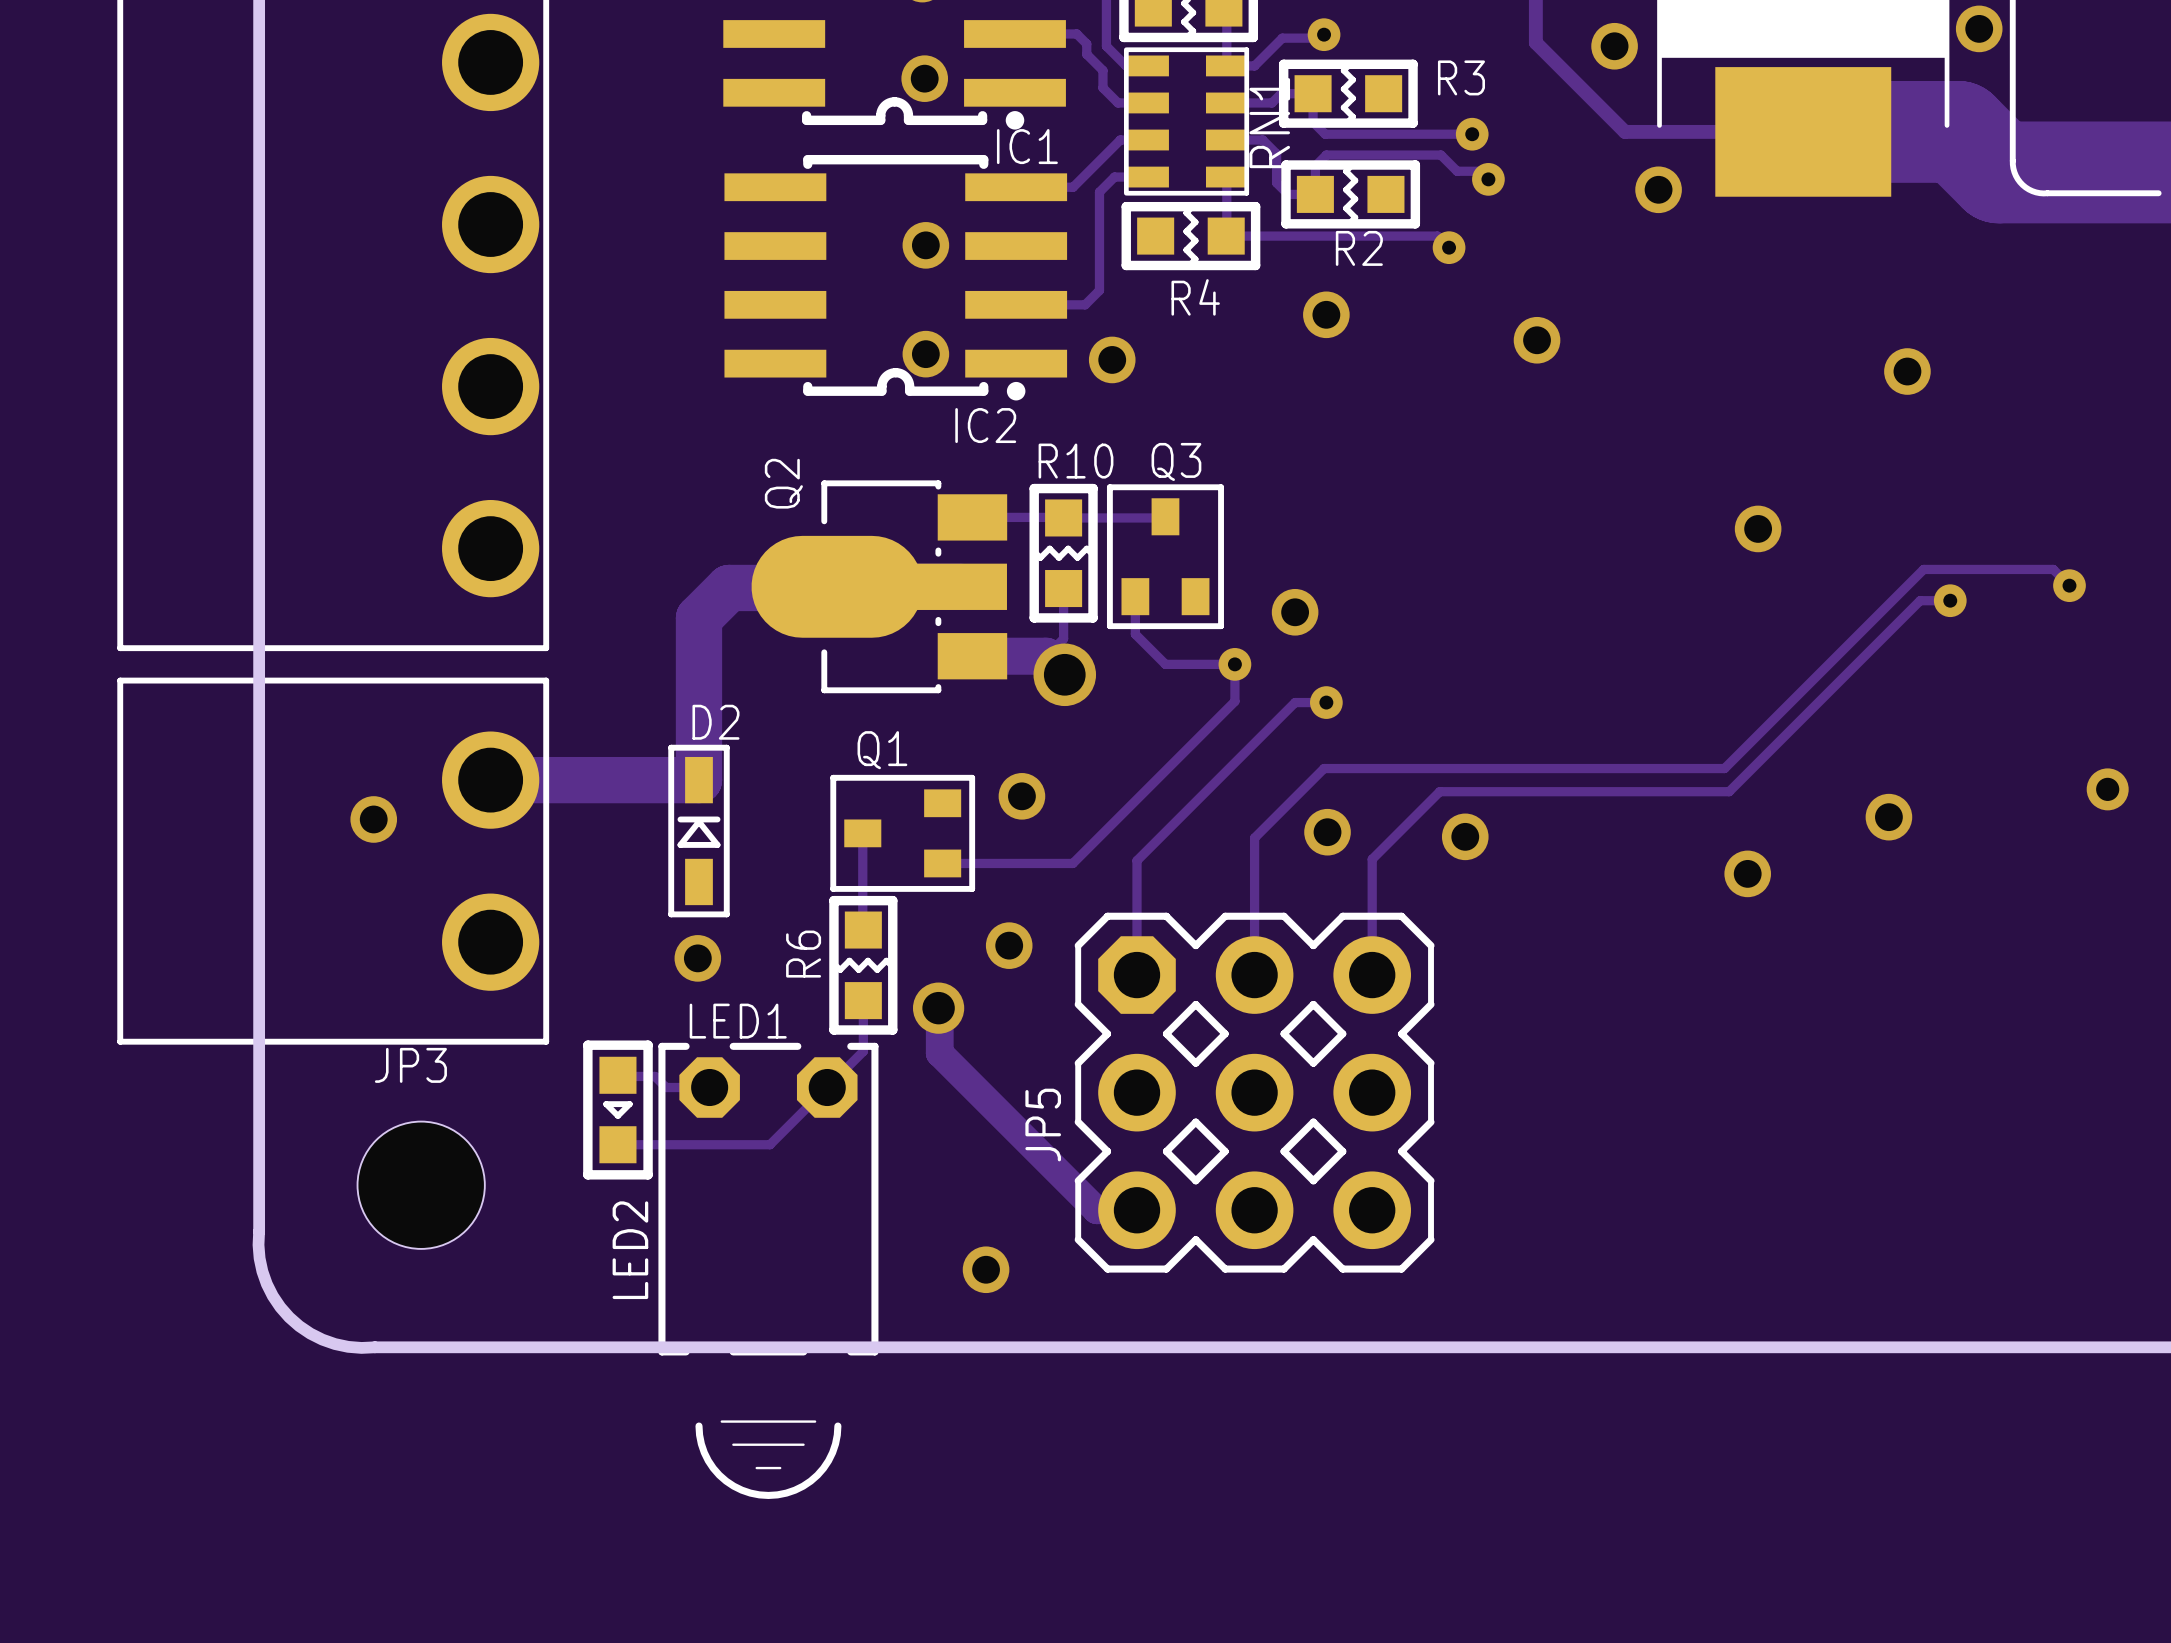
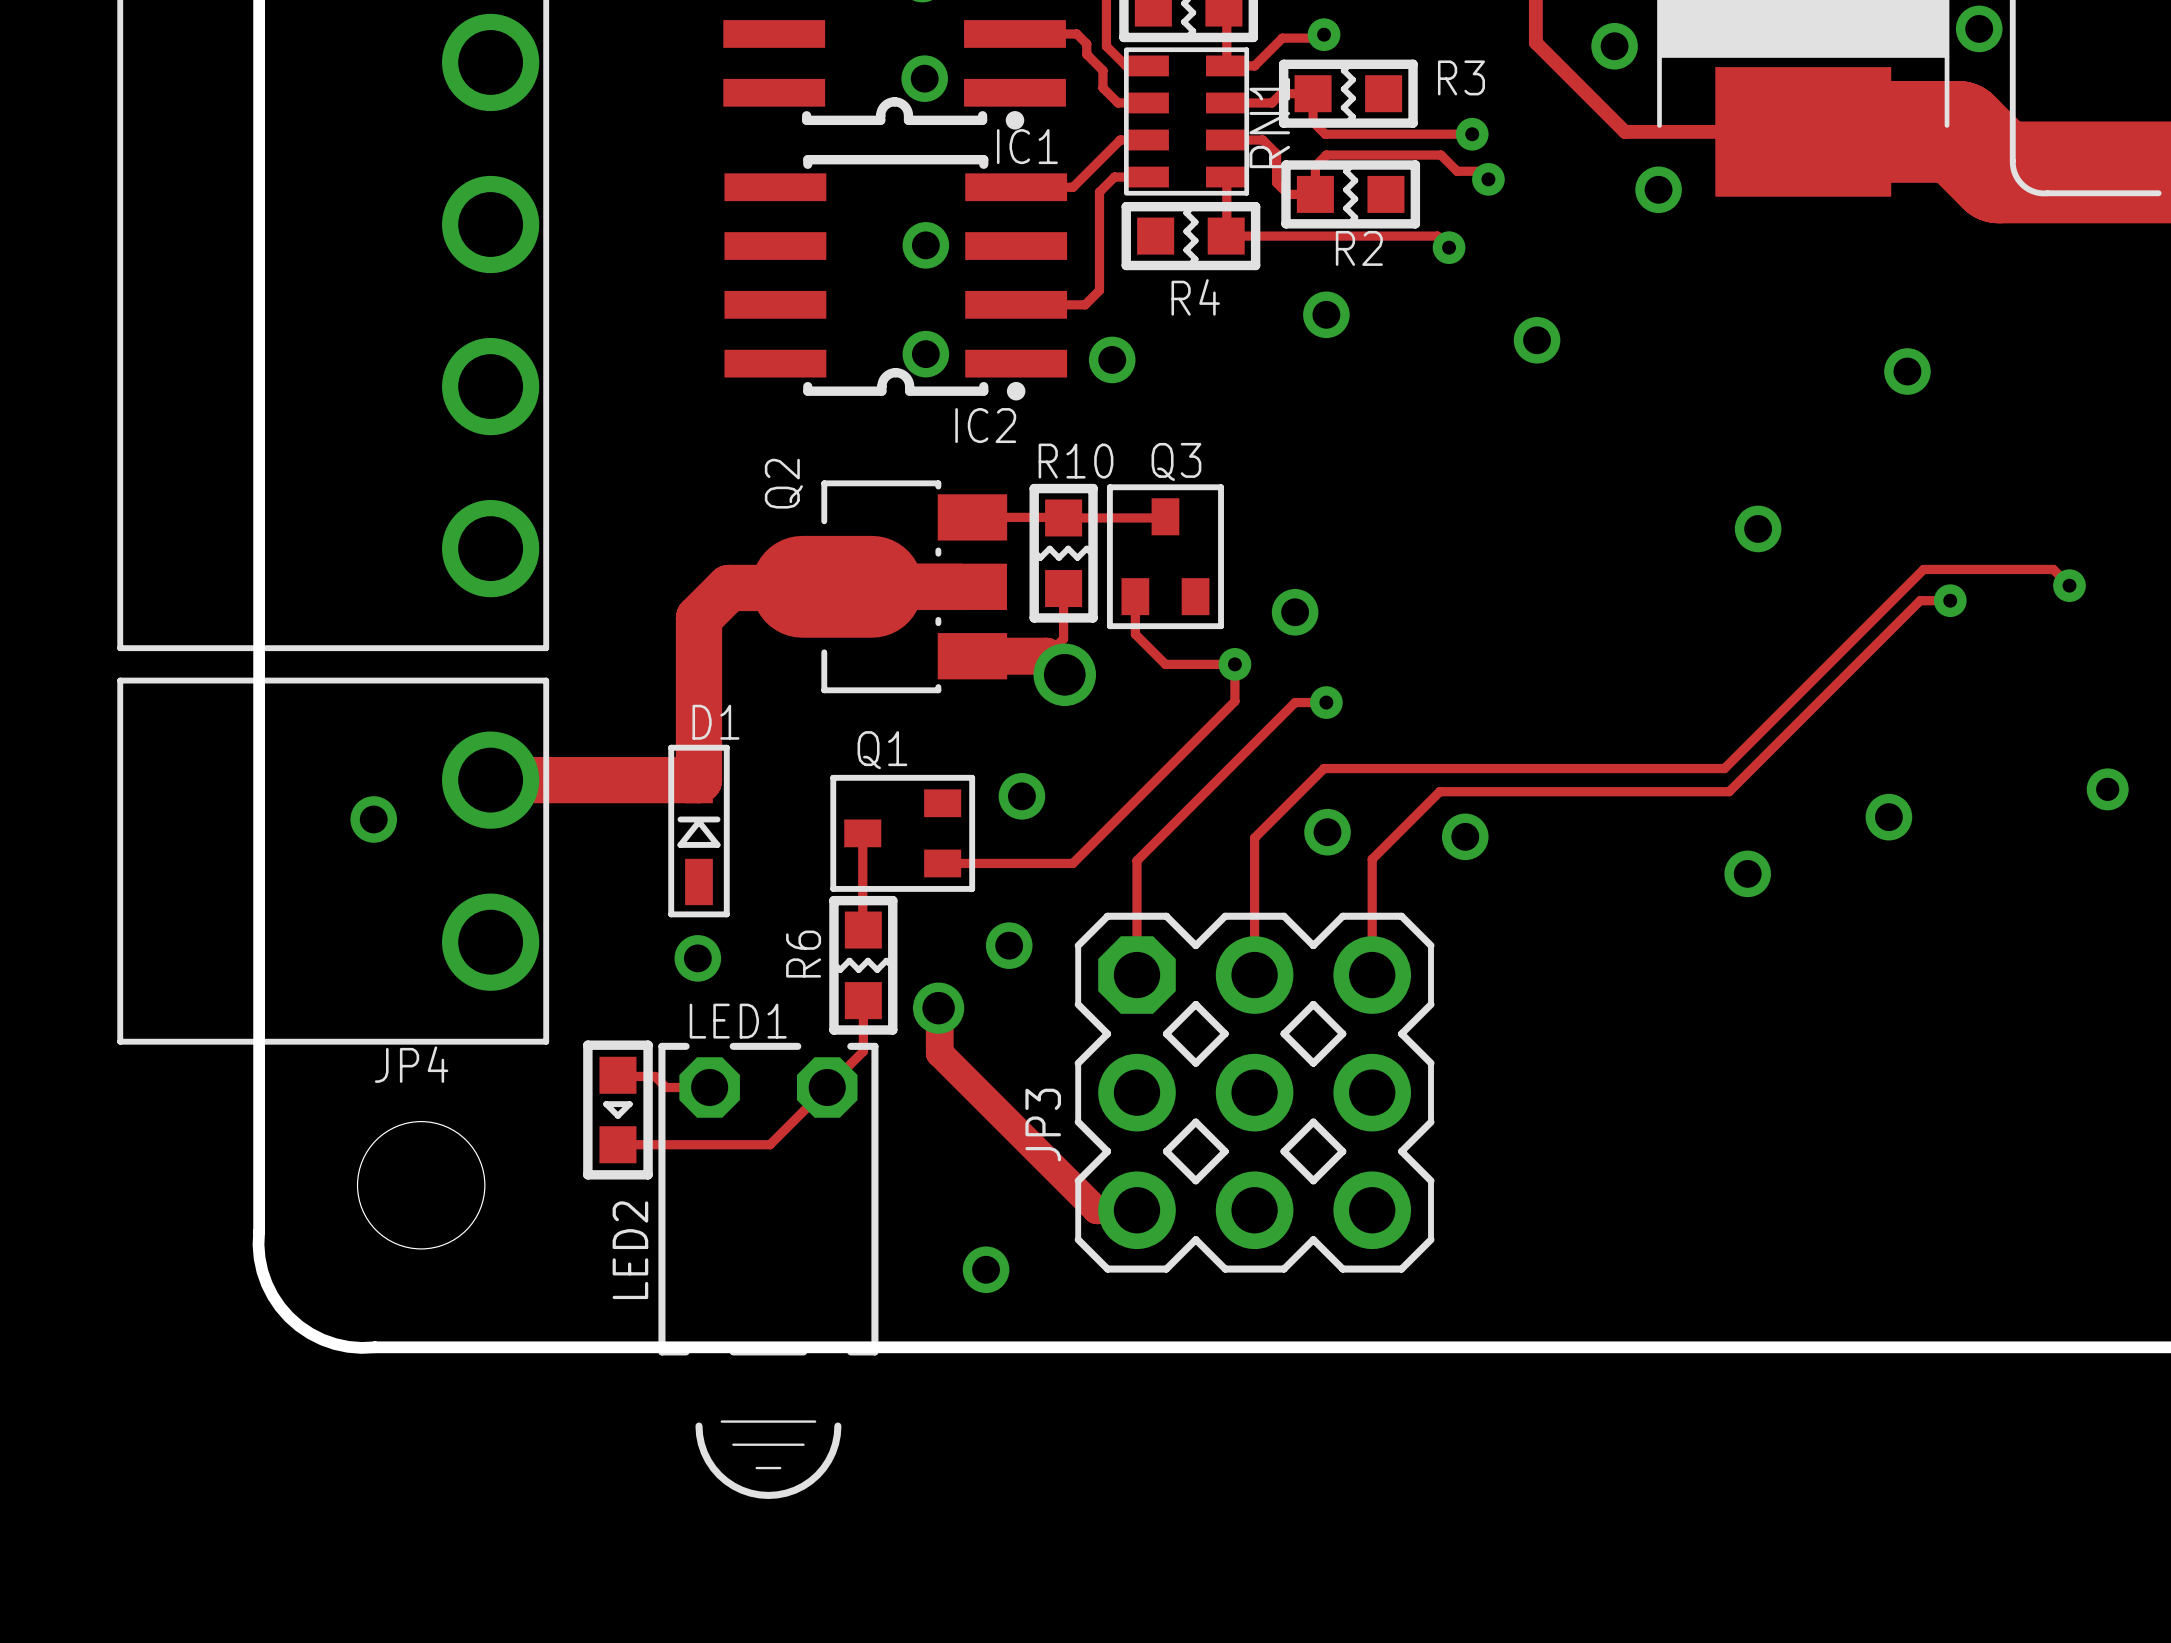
D2 name: D2 (715, 722) -> D1 (715, 722)
JP3 name: JP3 (410, 1065) -> JP4 (411, 1064)
JP5 name: JP5 (1043, 1125) -> JP3 (1043, 1125)

